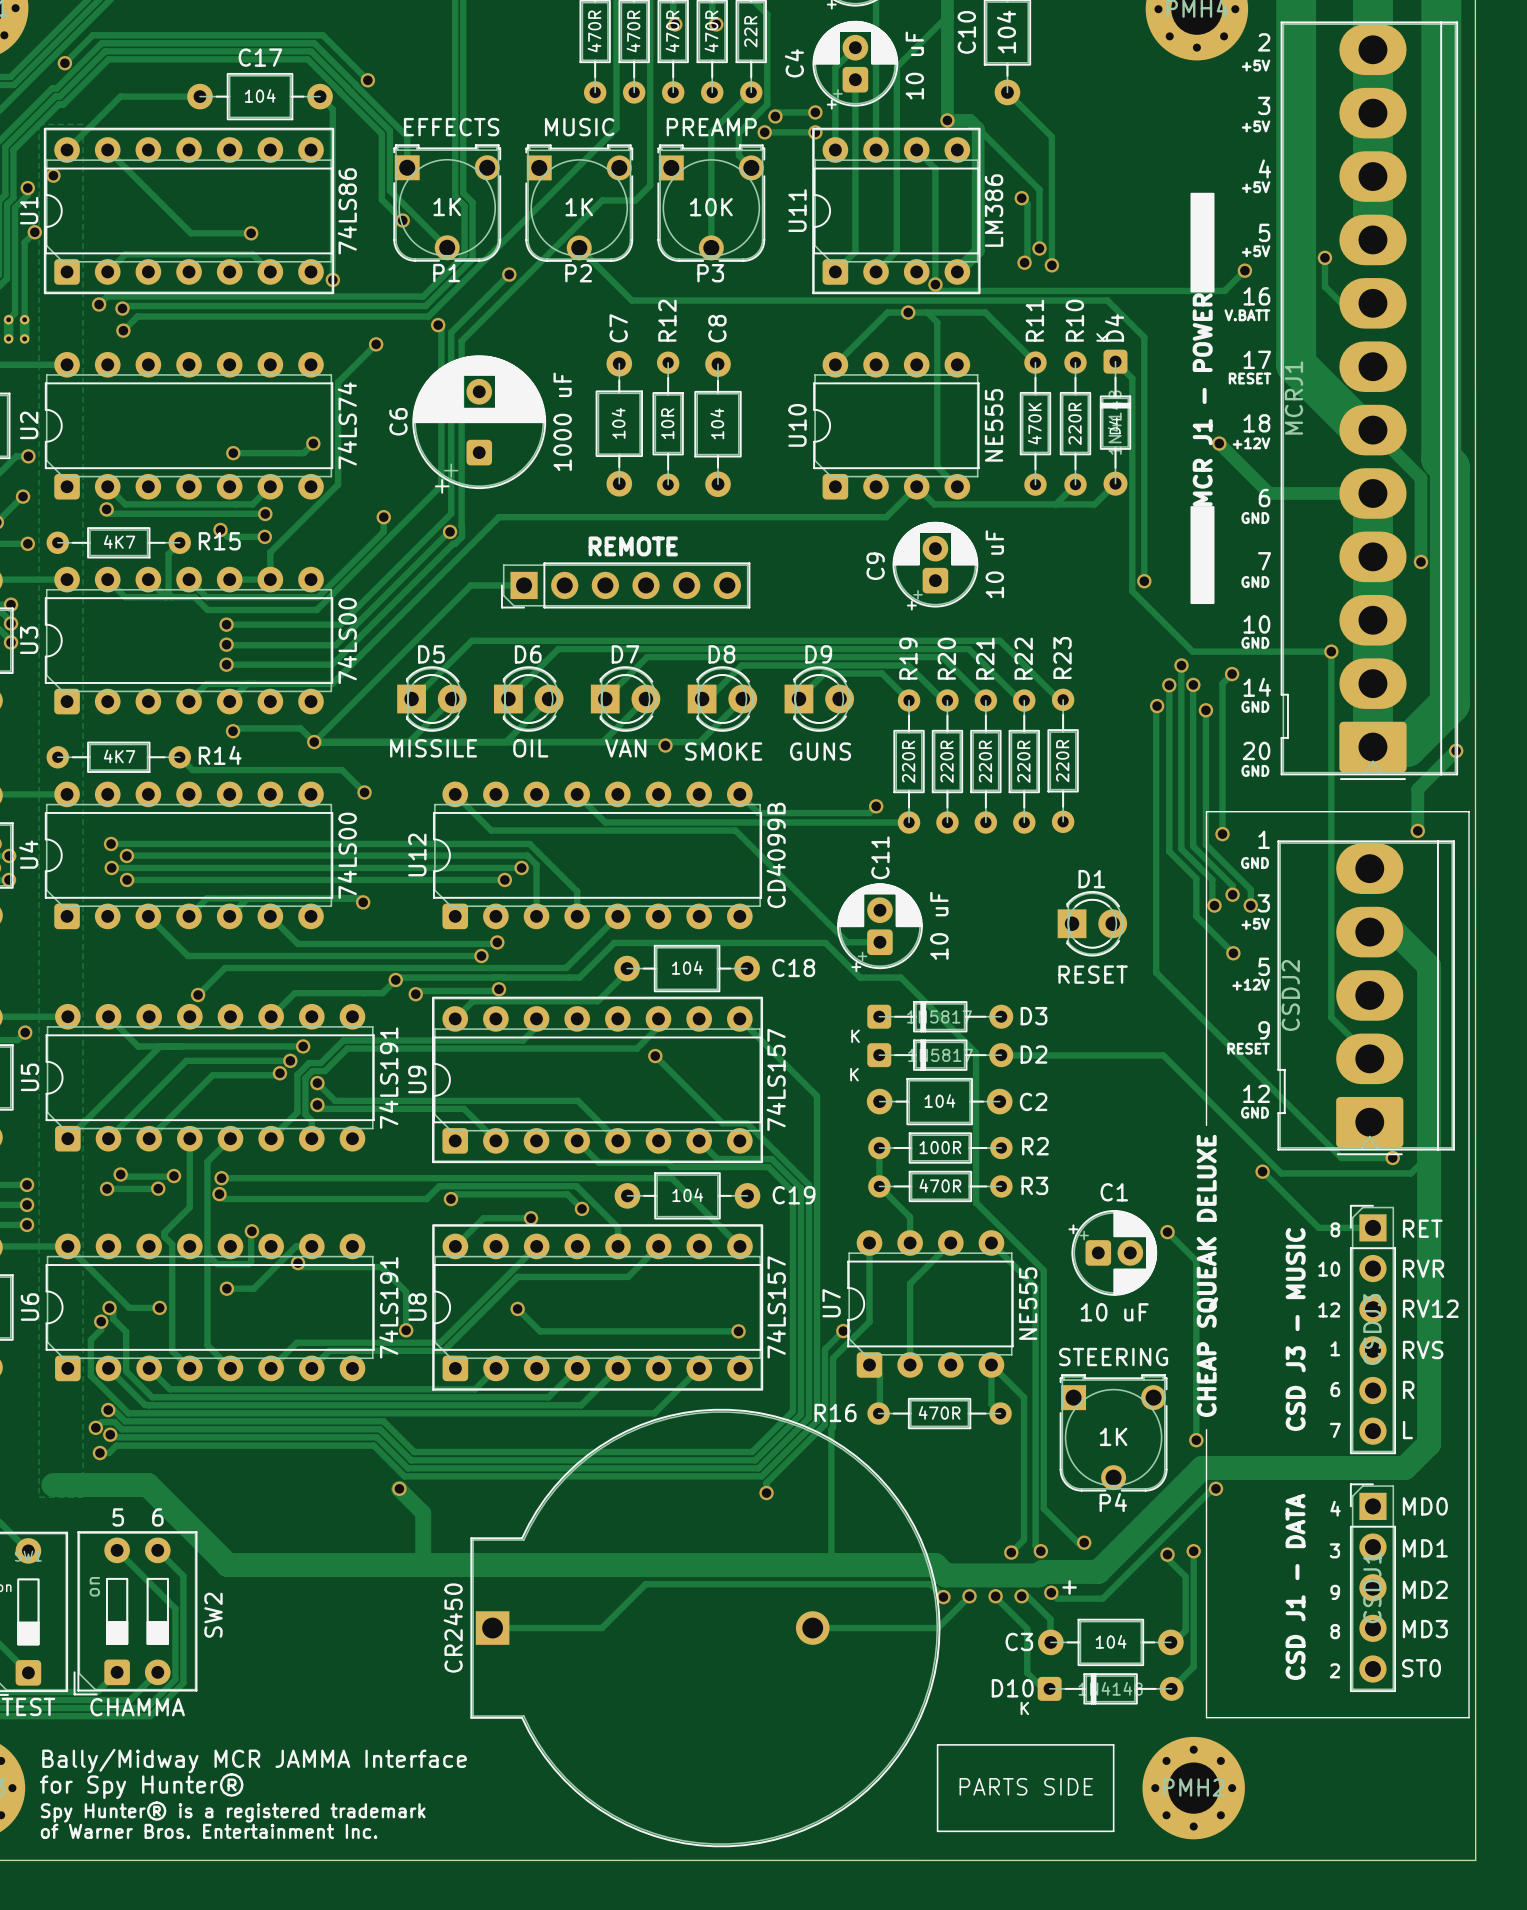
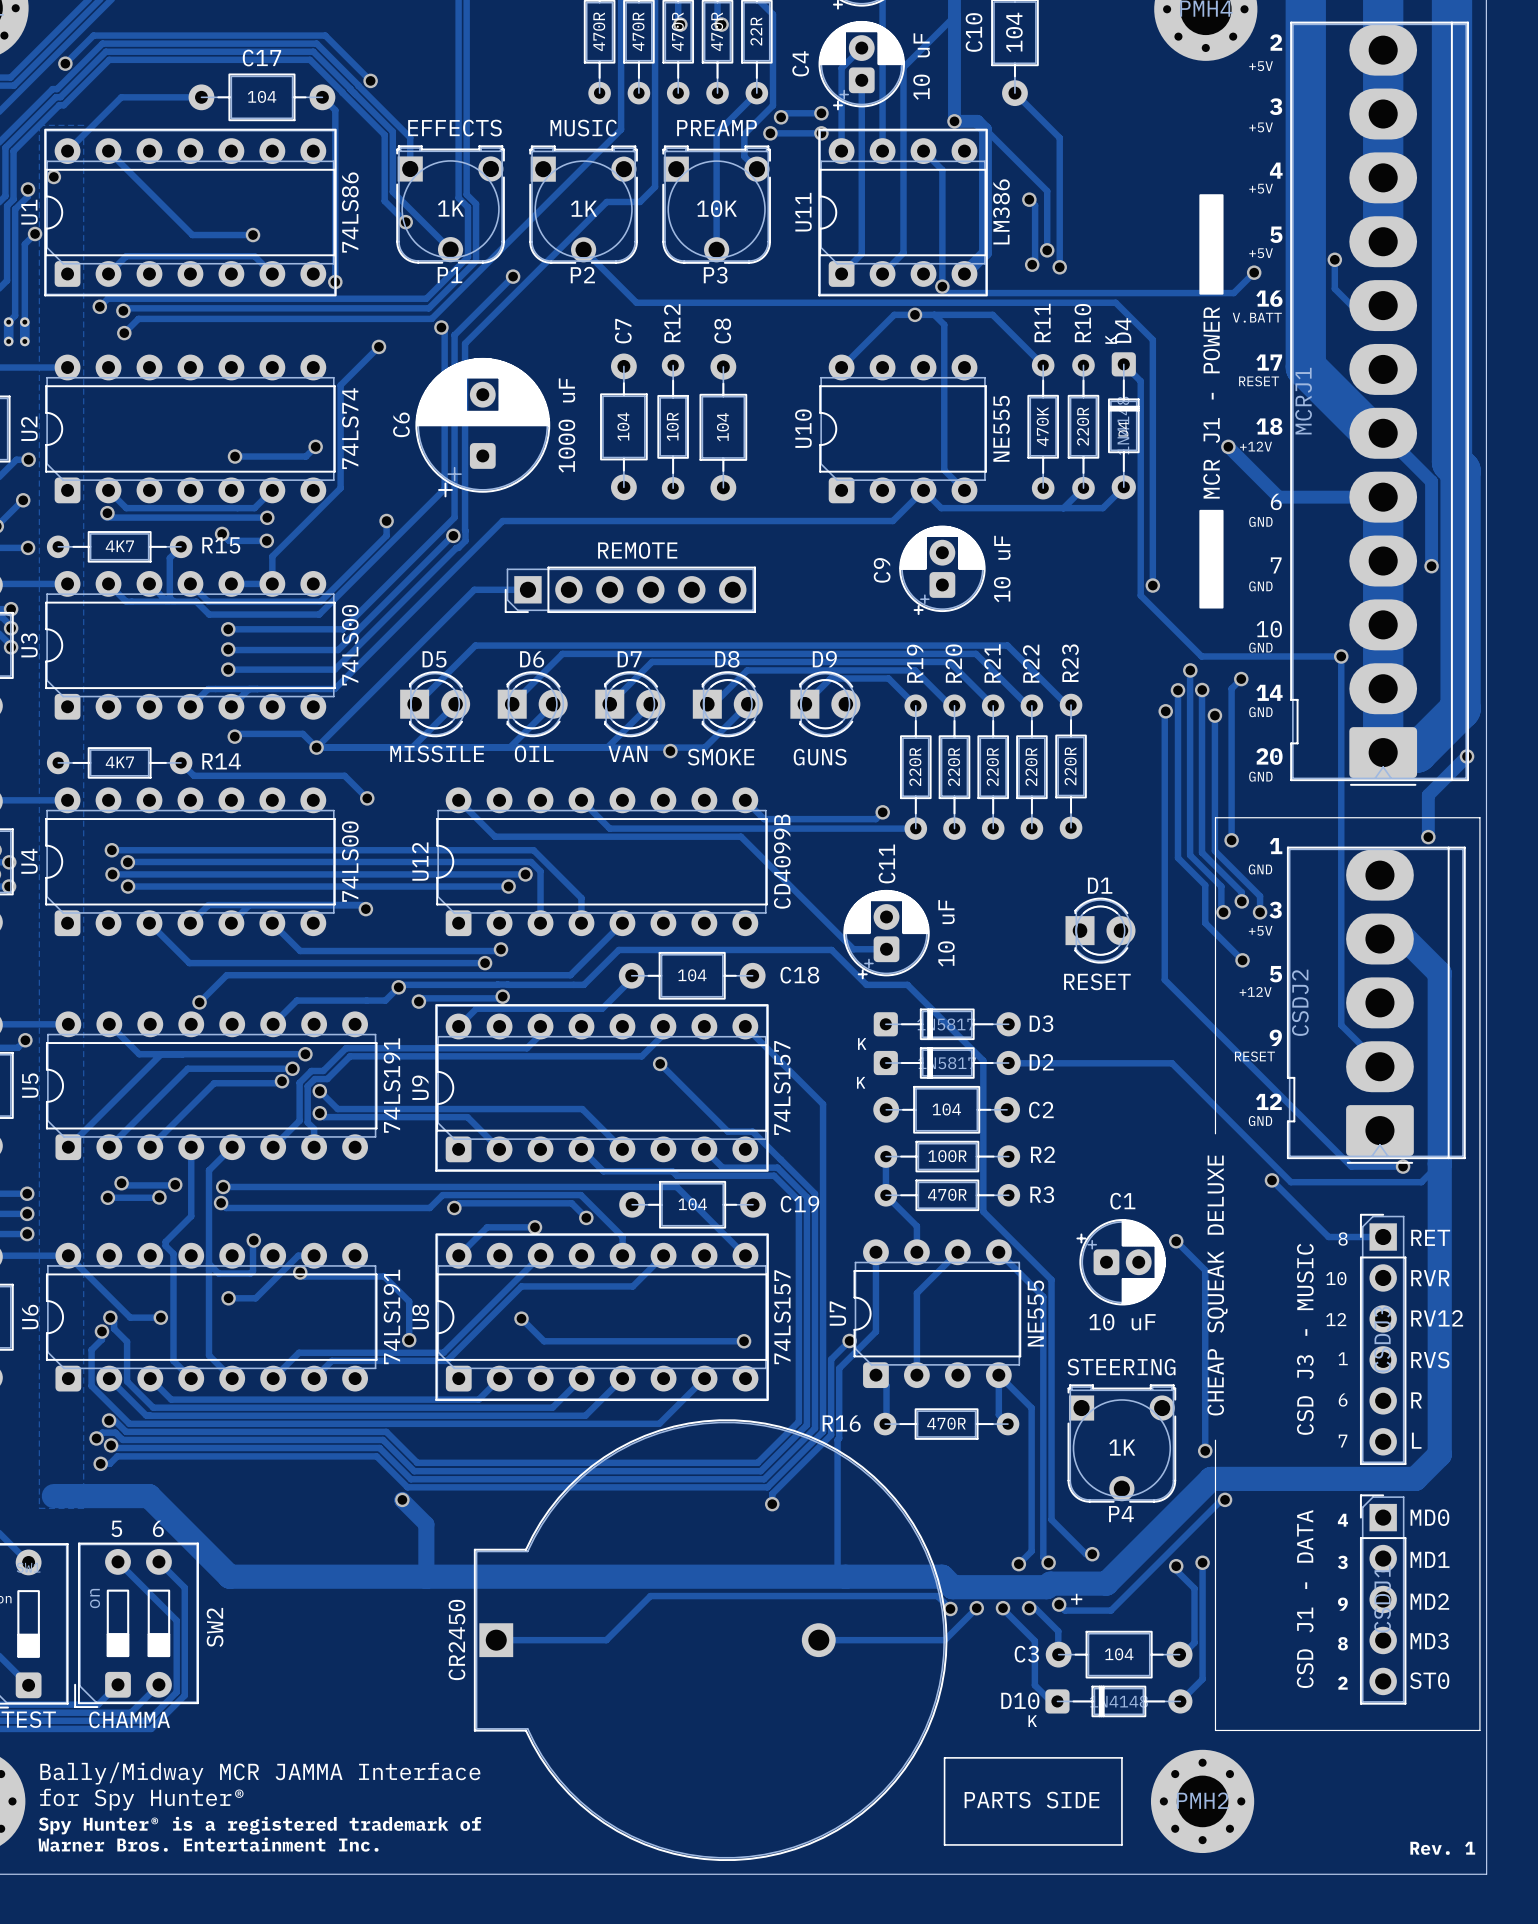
text: Spy Hunter® is a registered trademark (233, 1811) -> Spy Hunter® is a registered trademark of (259, 1825)
text: of Warner Bros. Entertainment Inc. (209, 1831) -> Warner Bros. Entertainment Inc. (208, 1844)
text: none -> Rev. 1 (1442, 1848)

